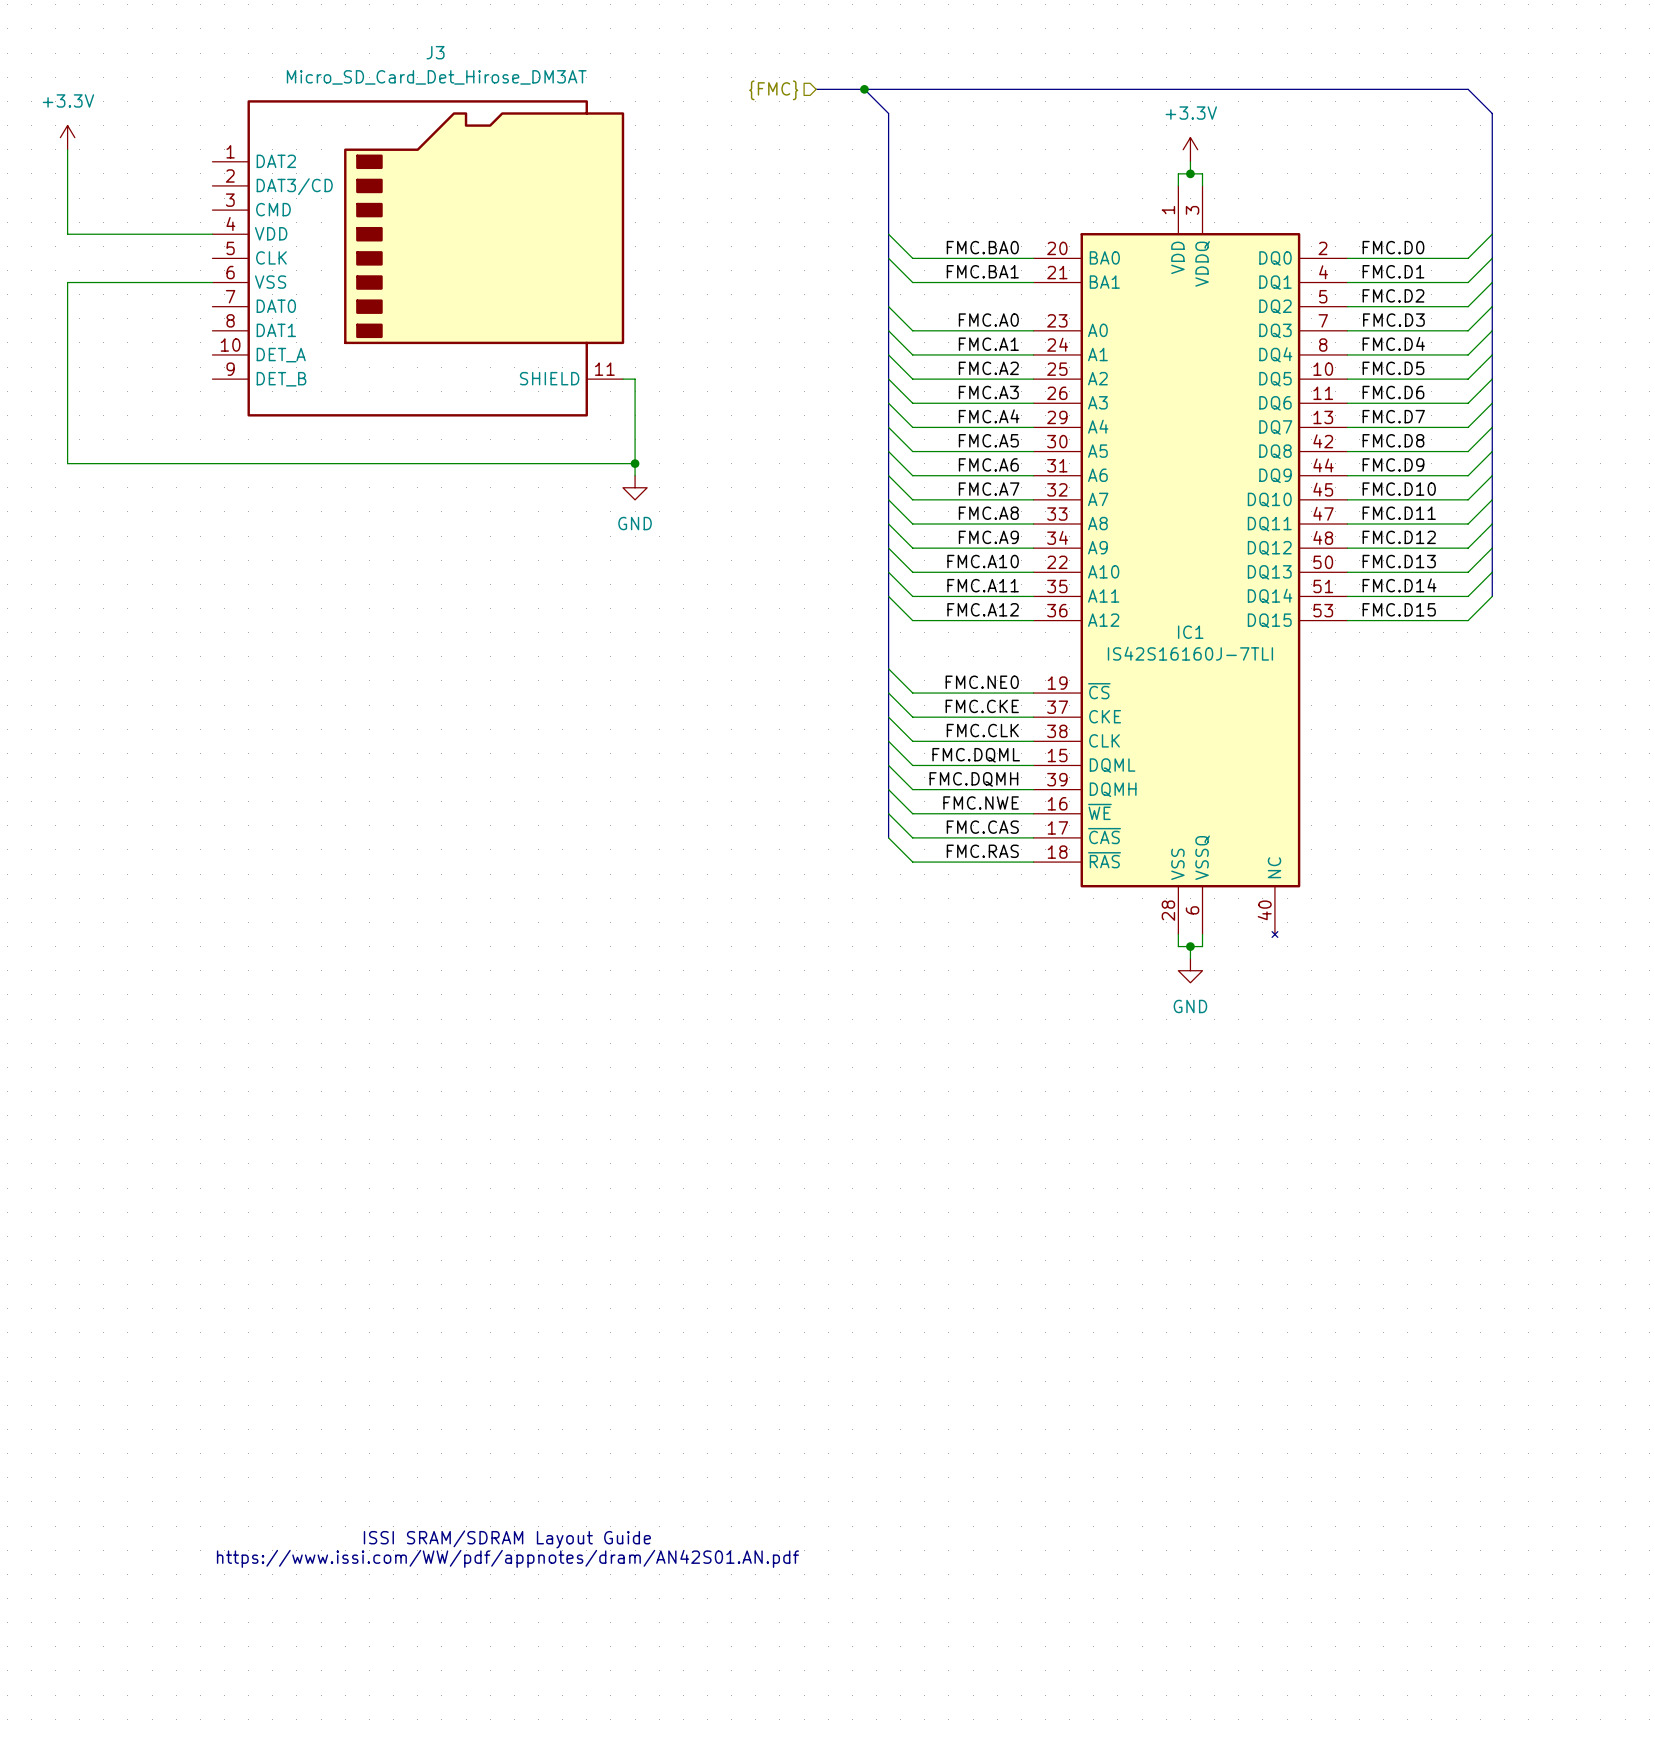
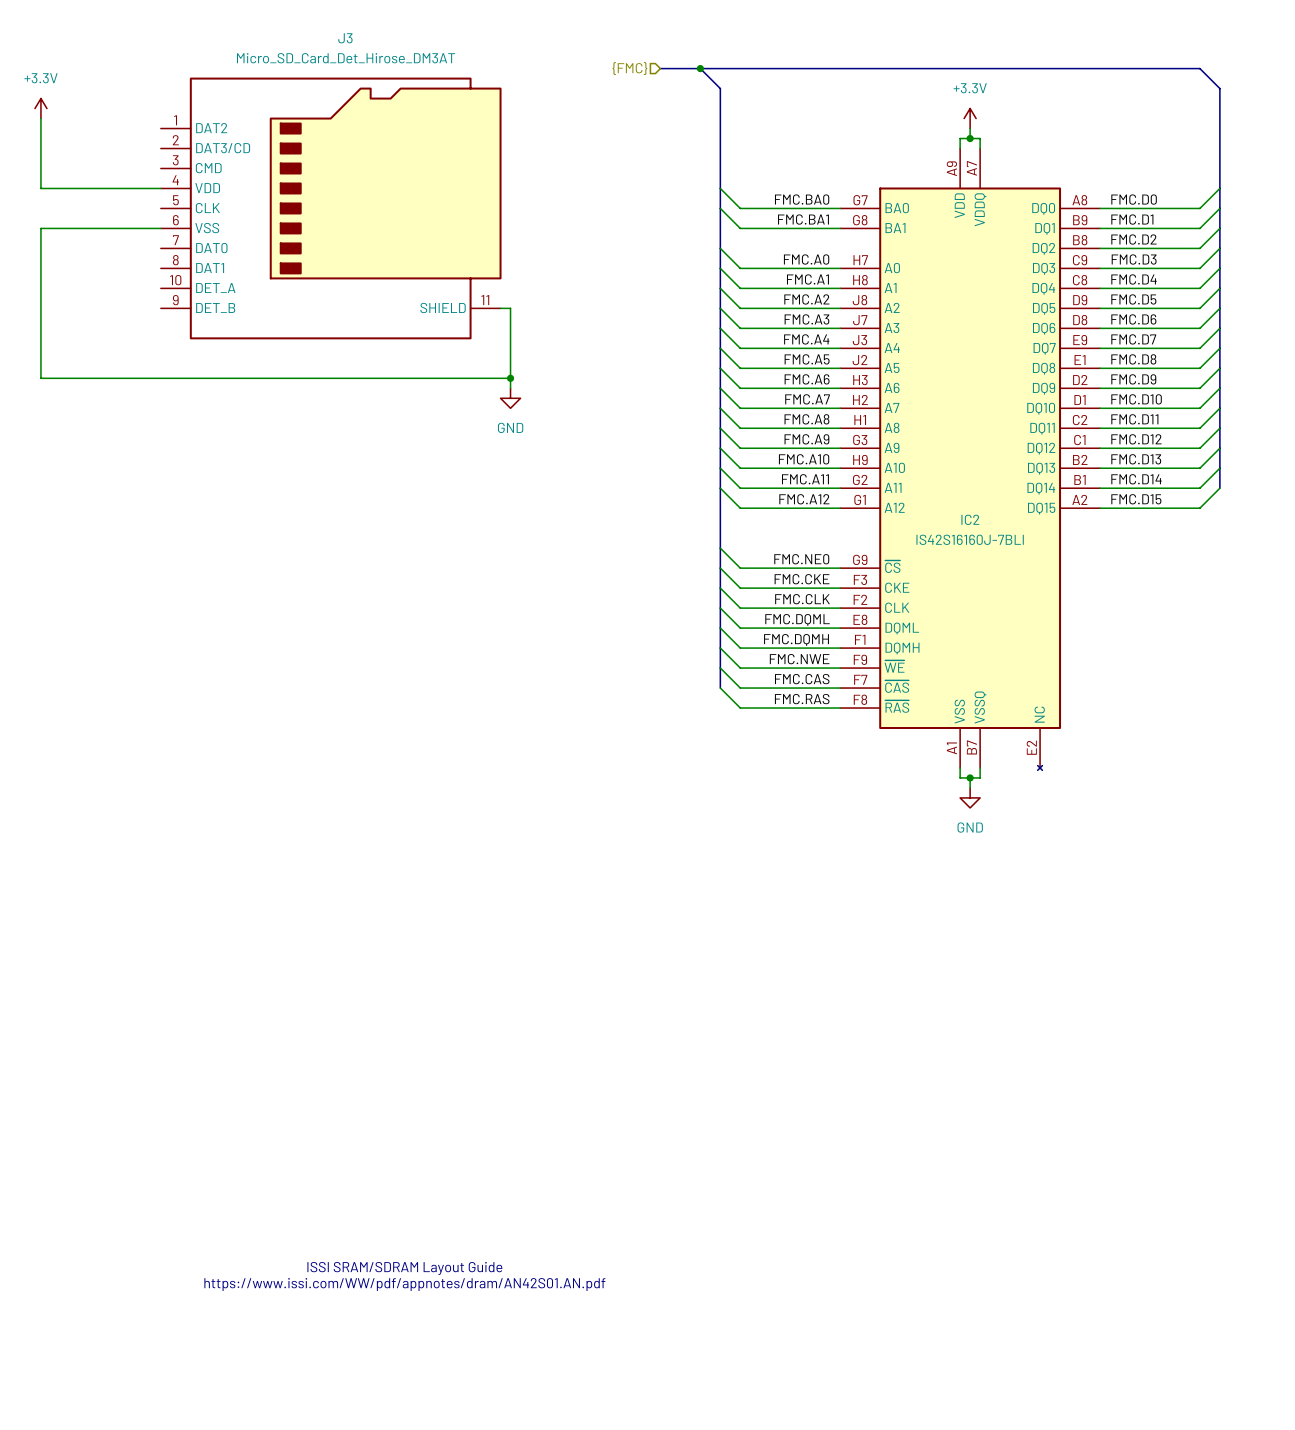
IC1 symbol: [1033, 185, 1348, 938] -> [840, 148, 1101, 771]
IC1 name: IC1 (1190, 632) -> IC2 (970, 519)
IC1 value: IS42S16160J-7TLI (1190, 653) -> IS42S16160J-7BLI (970, 539)

